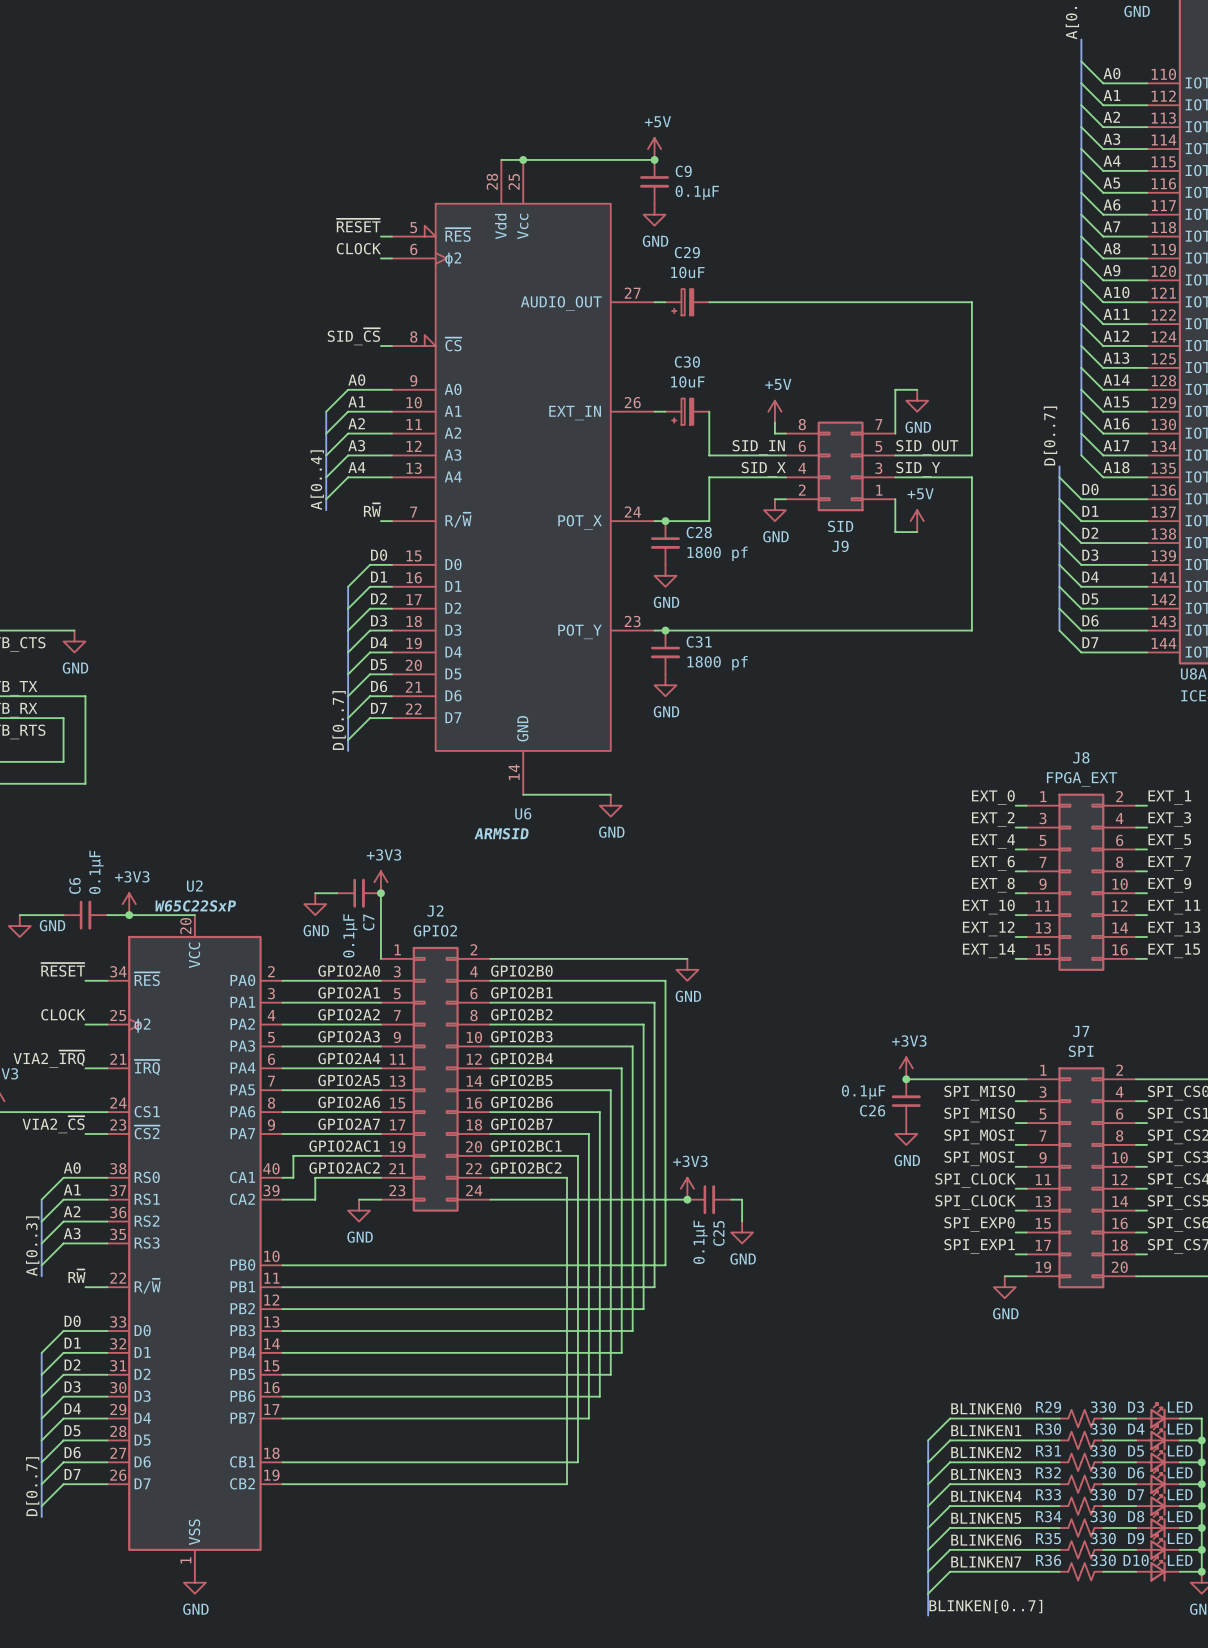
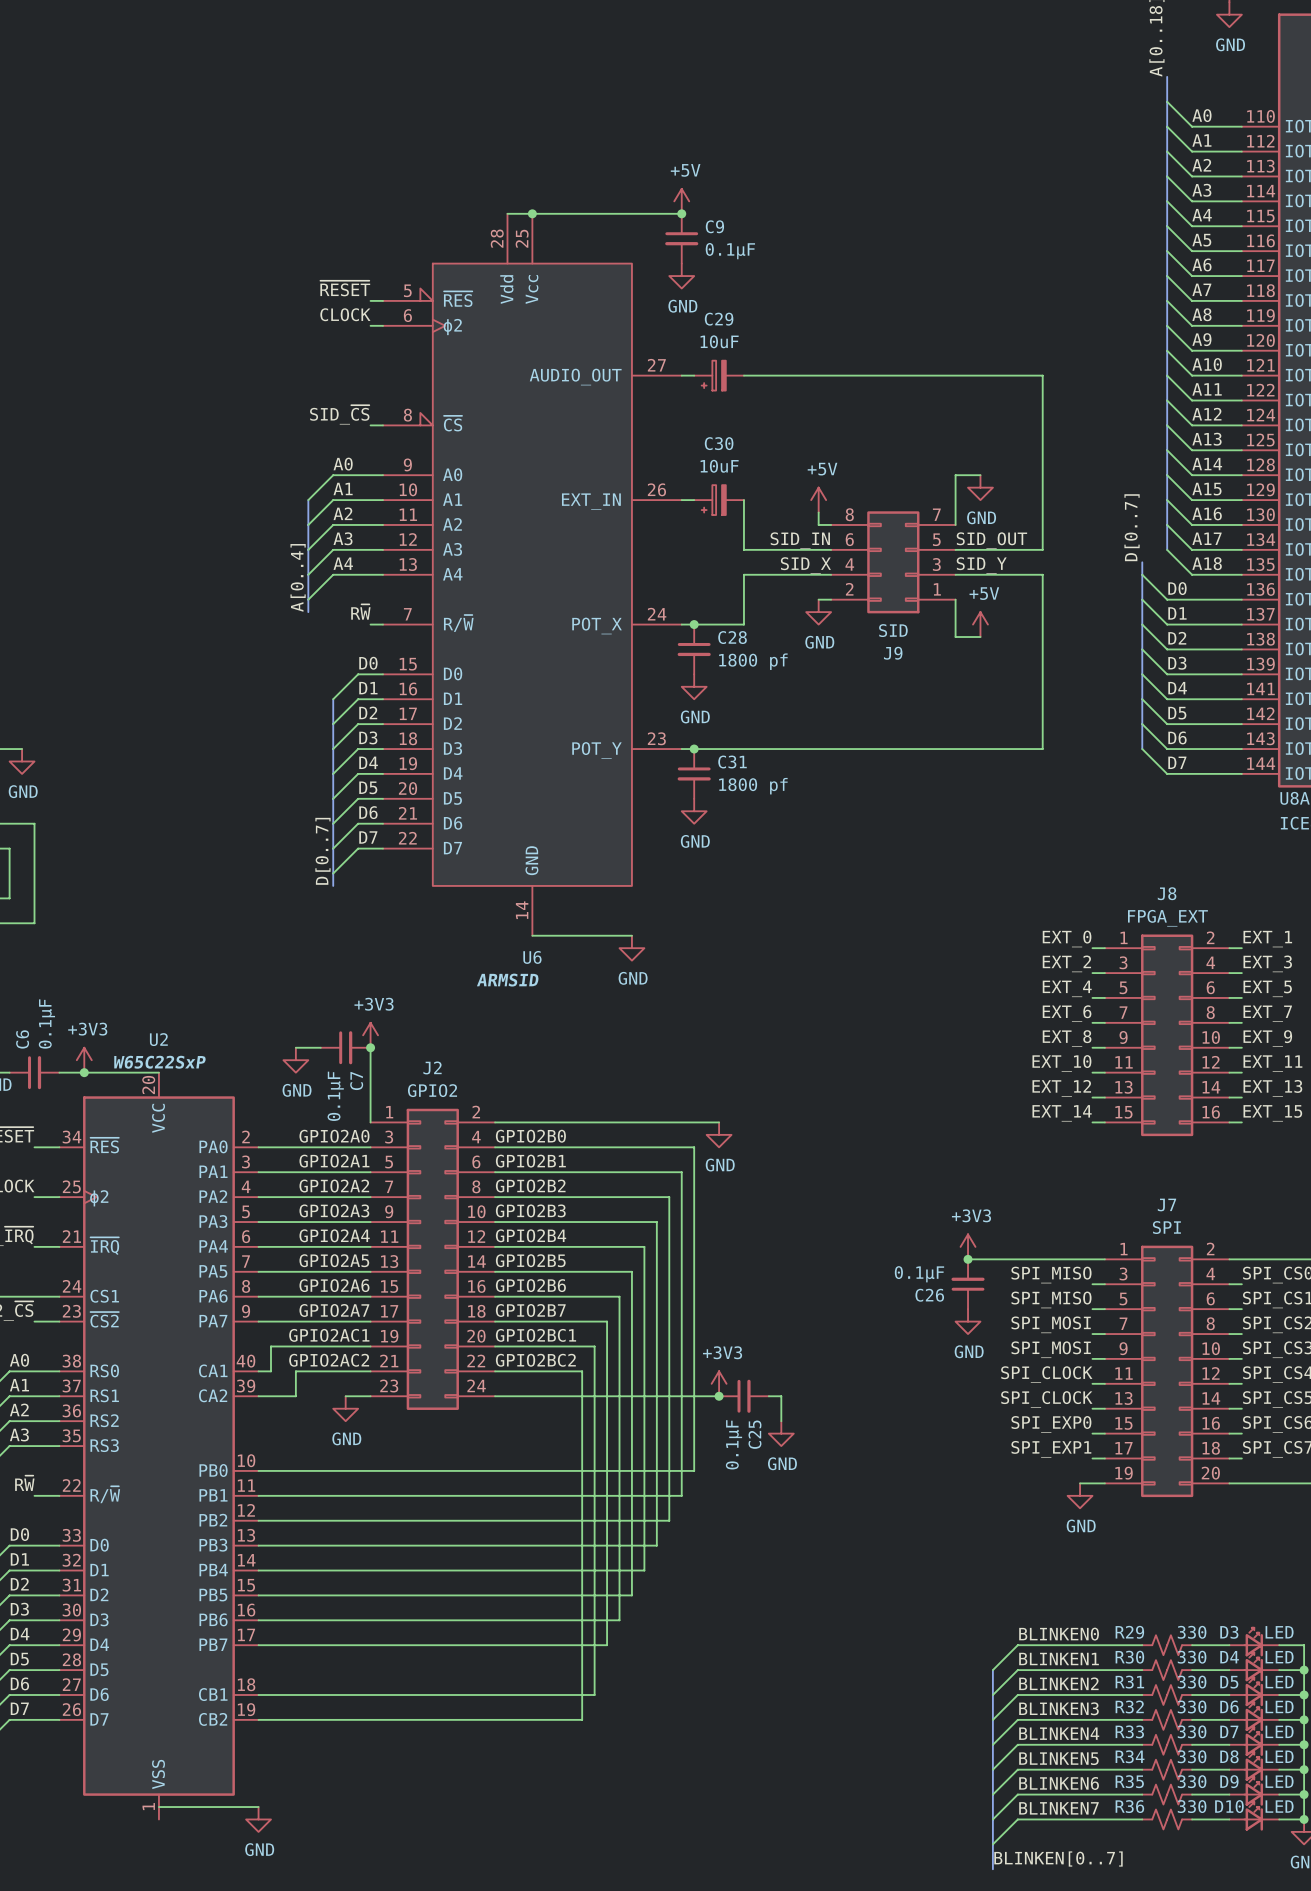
wire: none -> (158, 1807) (258, 1807)
power symbol position: GND (194, 1582) -> GND (258, 1819)

